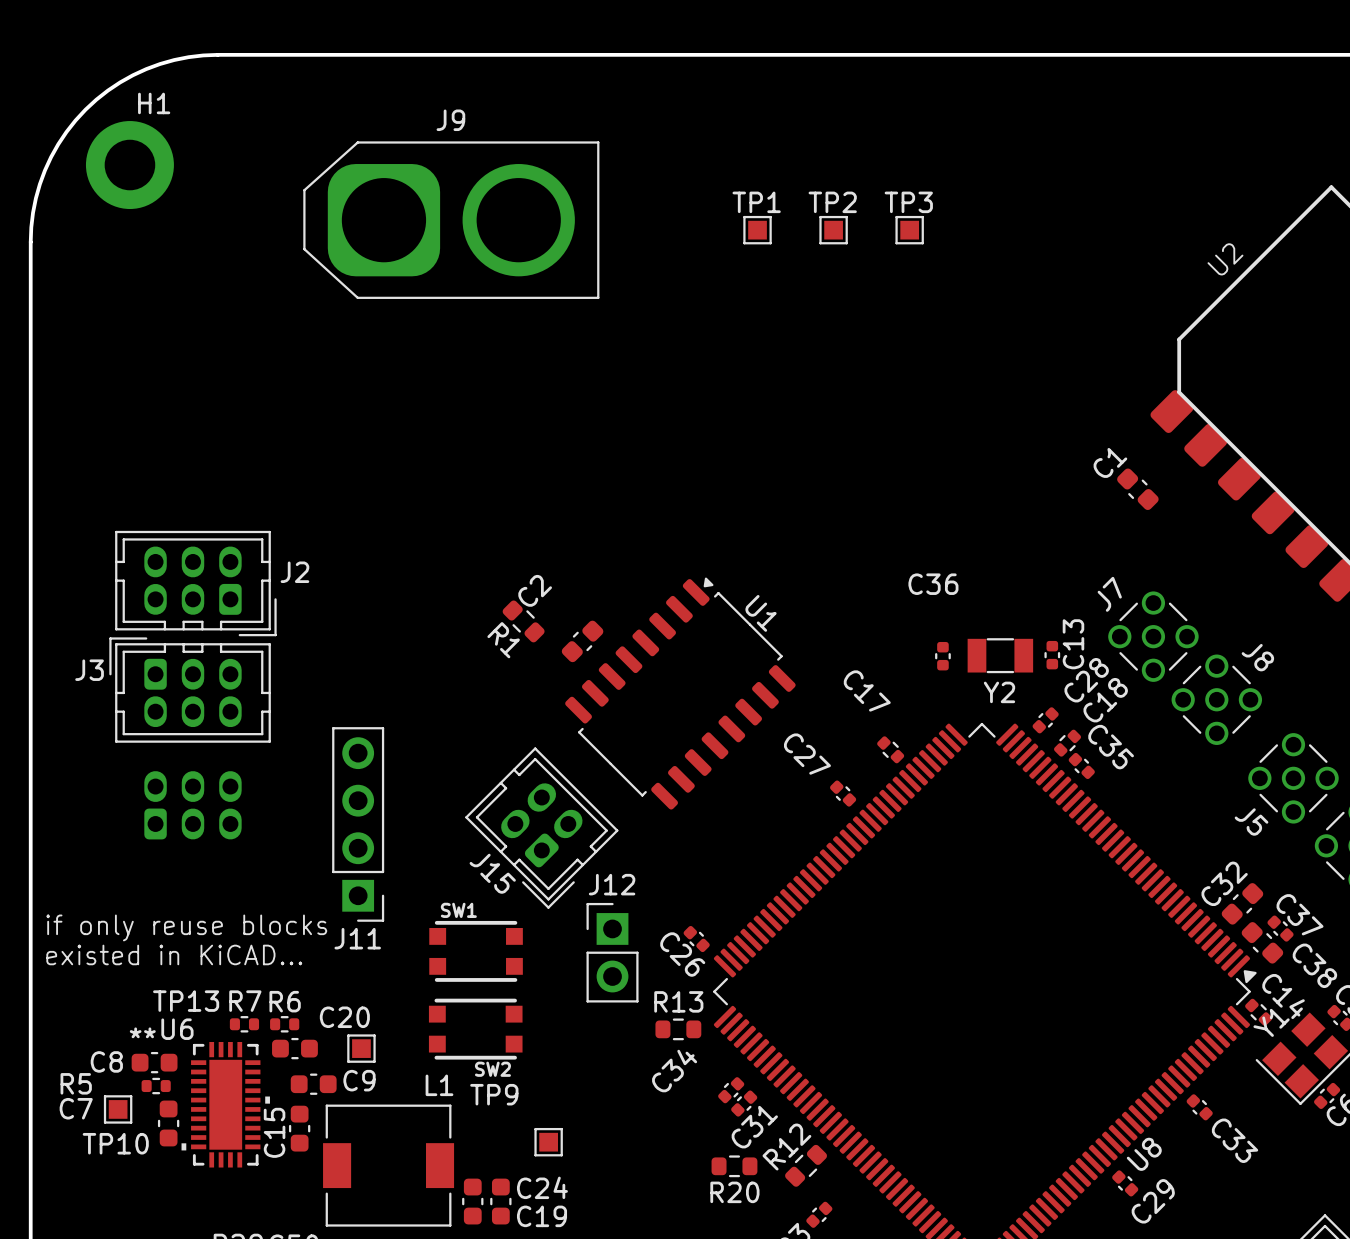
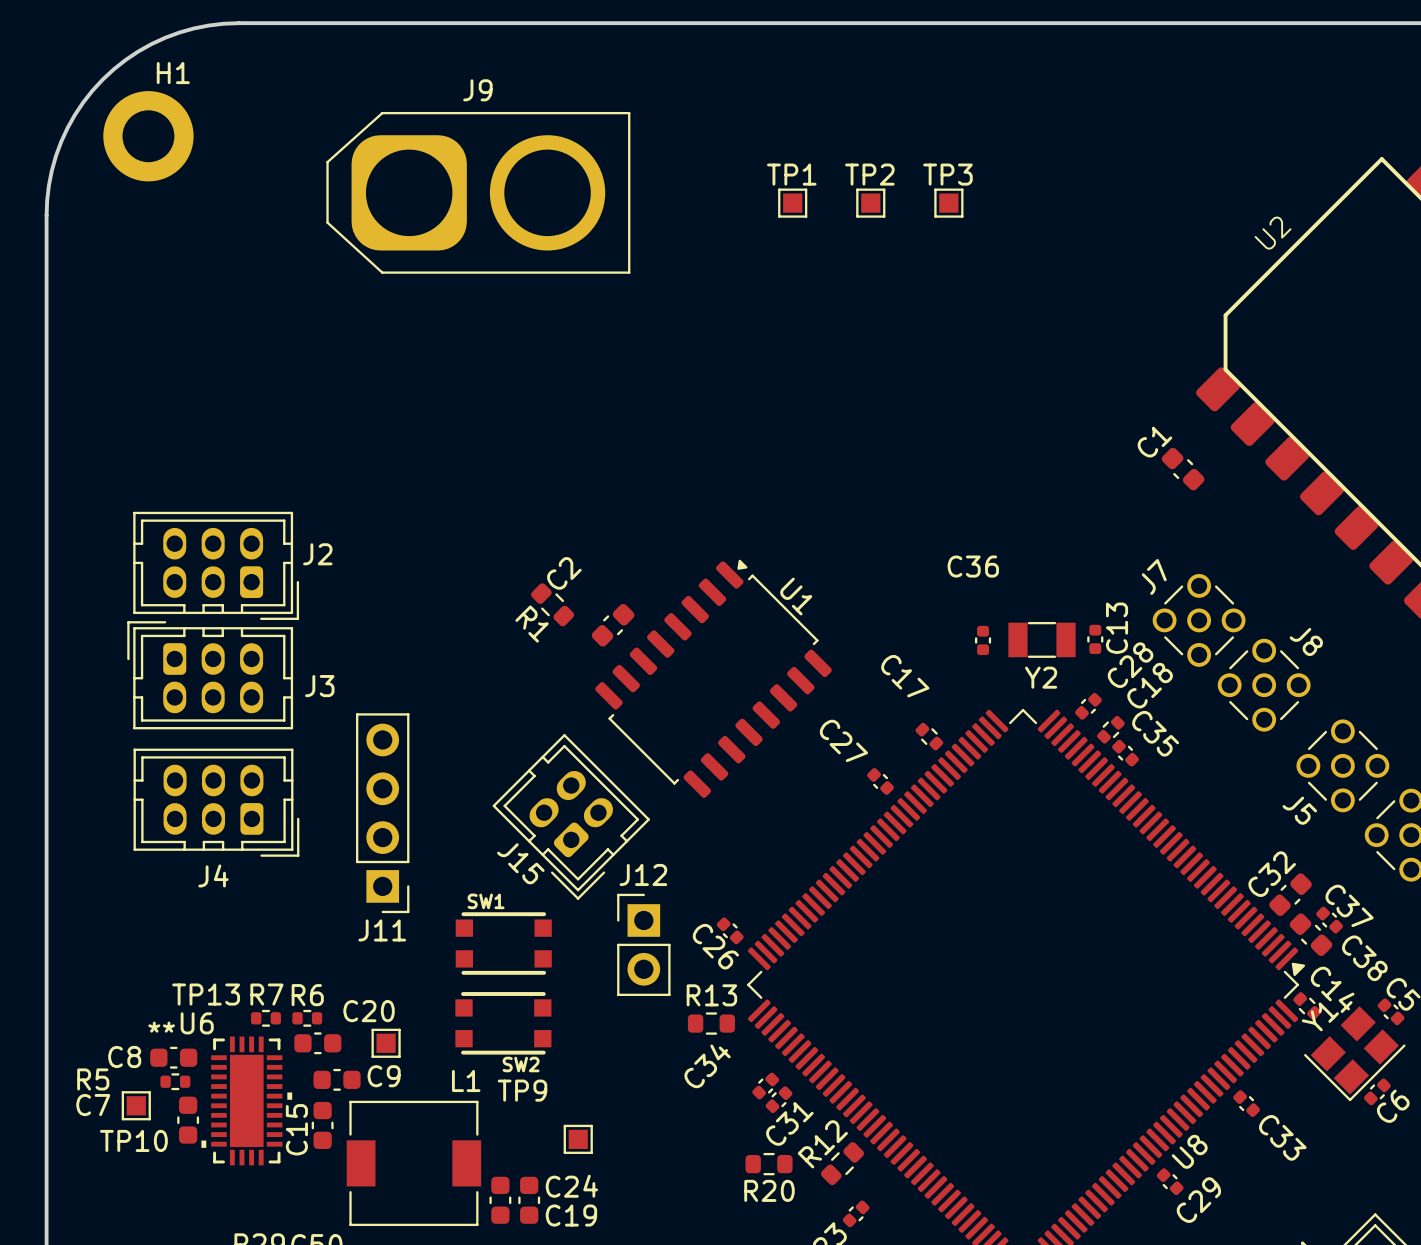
J3 name position: J3 (89, 670) -> J3 (319, 686)
J4 side: bottom (192, 805) -> top (216, 802)
text: if only reuse blocks (186, 927) -> none
text: existed in KiCAD... (174, 954) -> none

